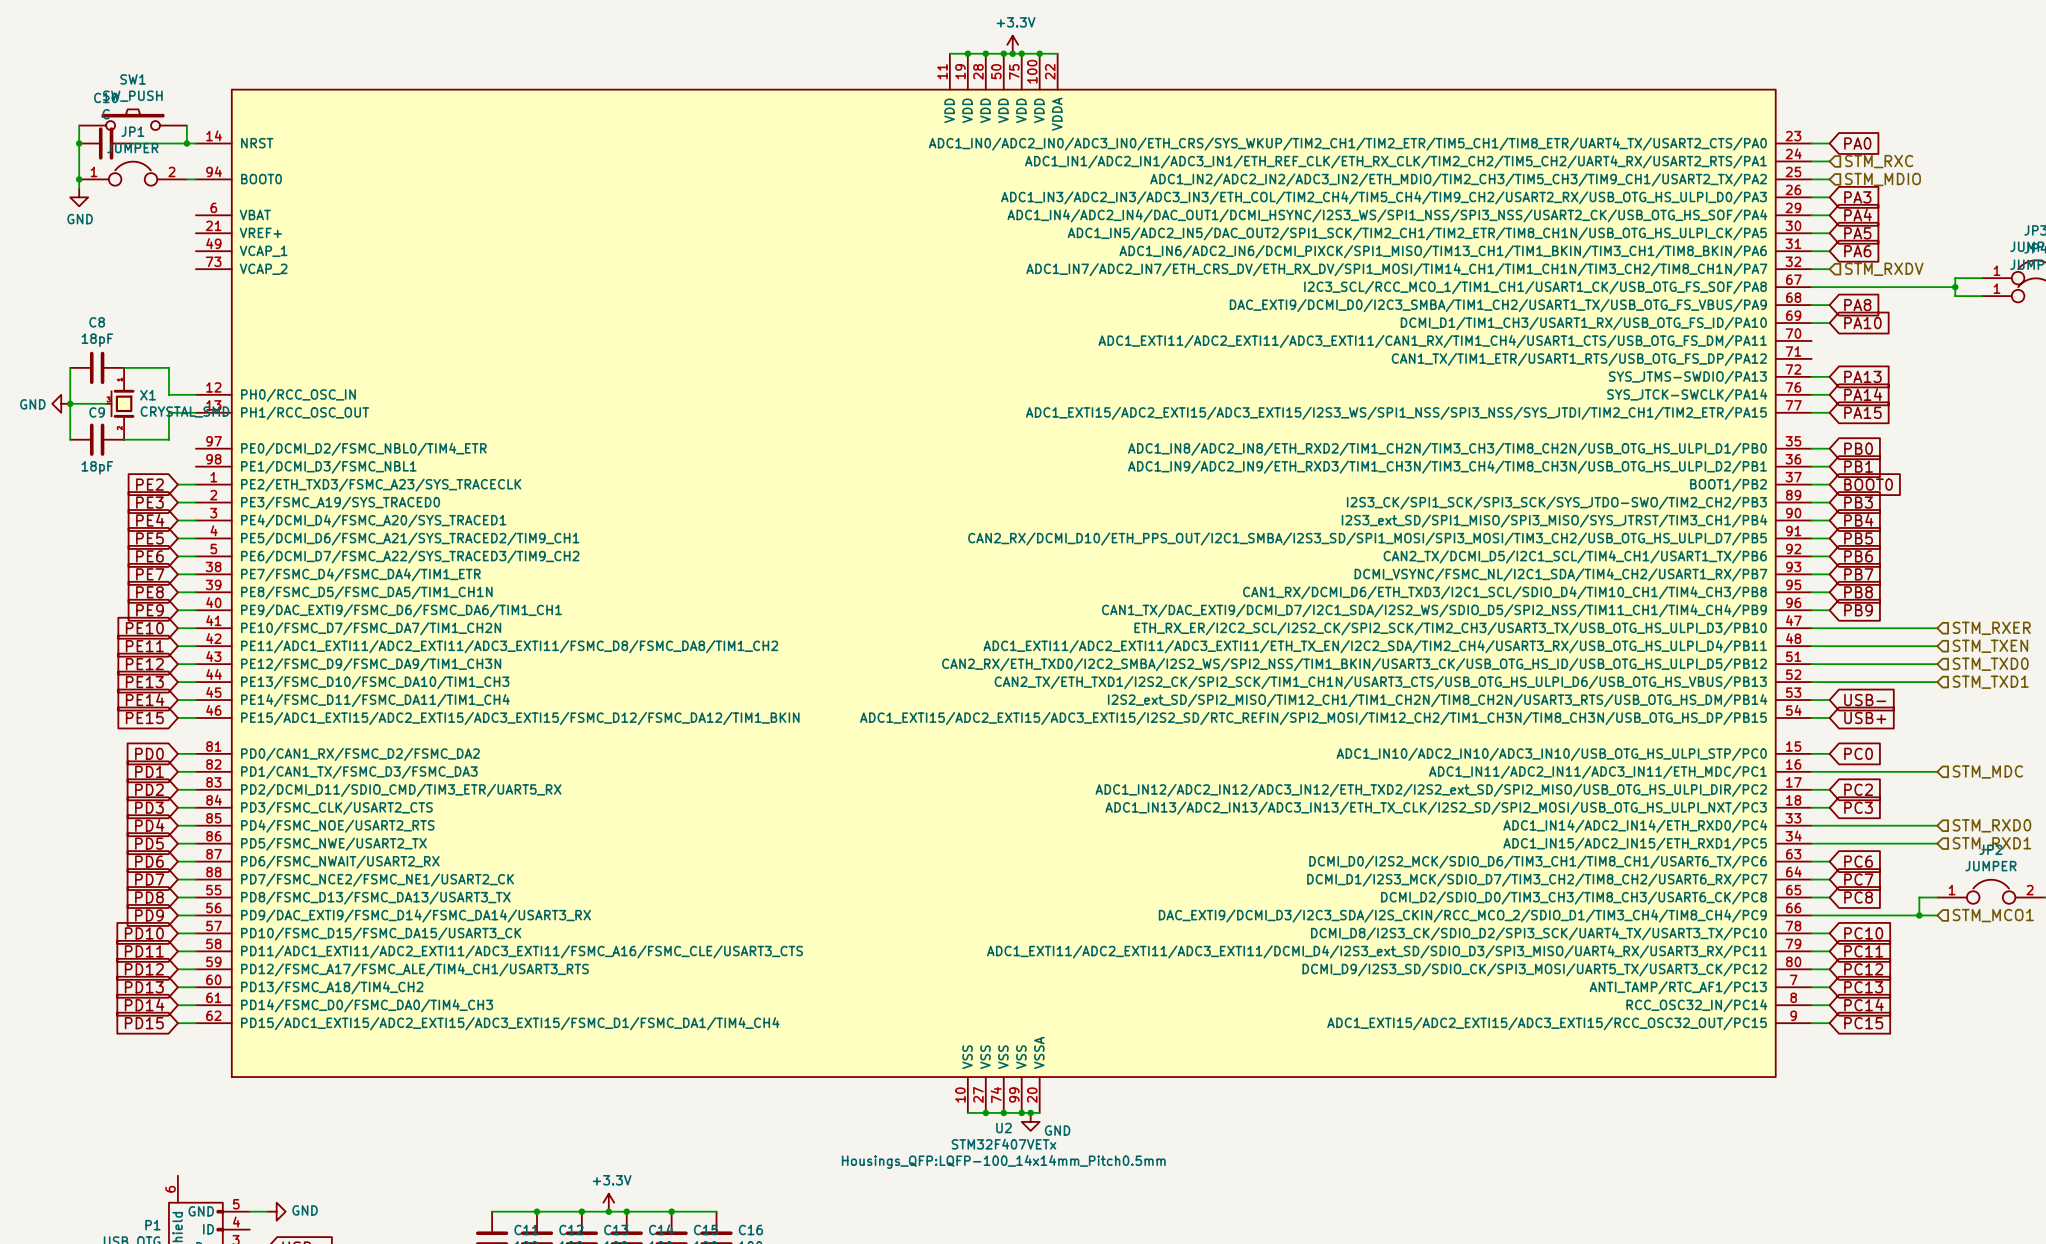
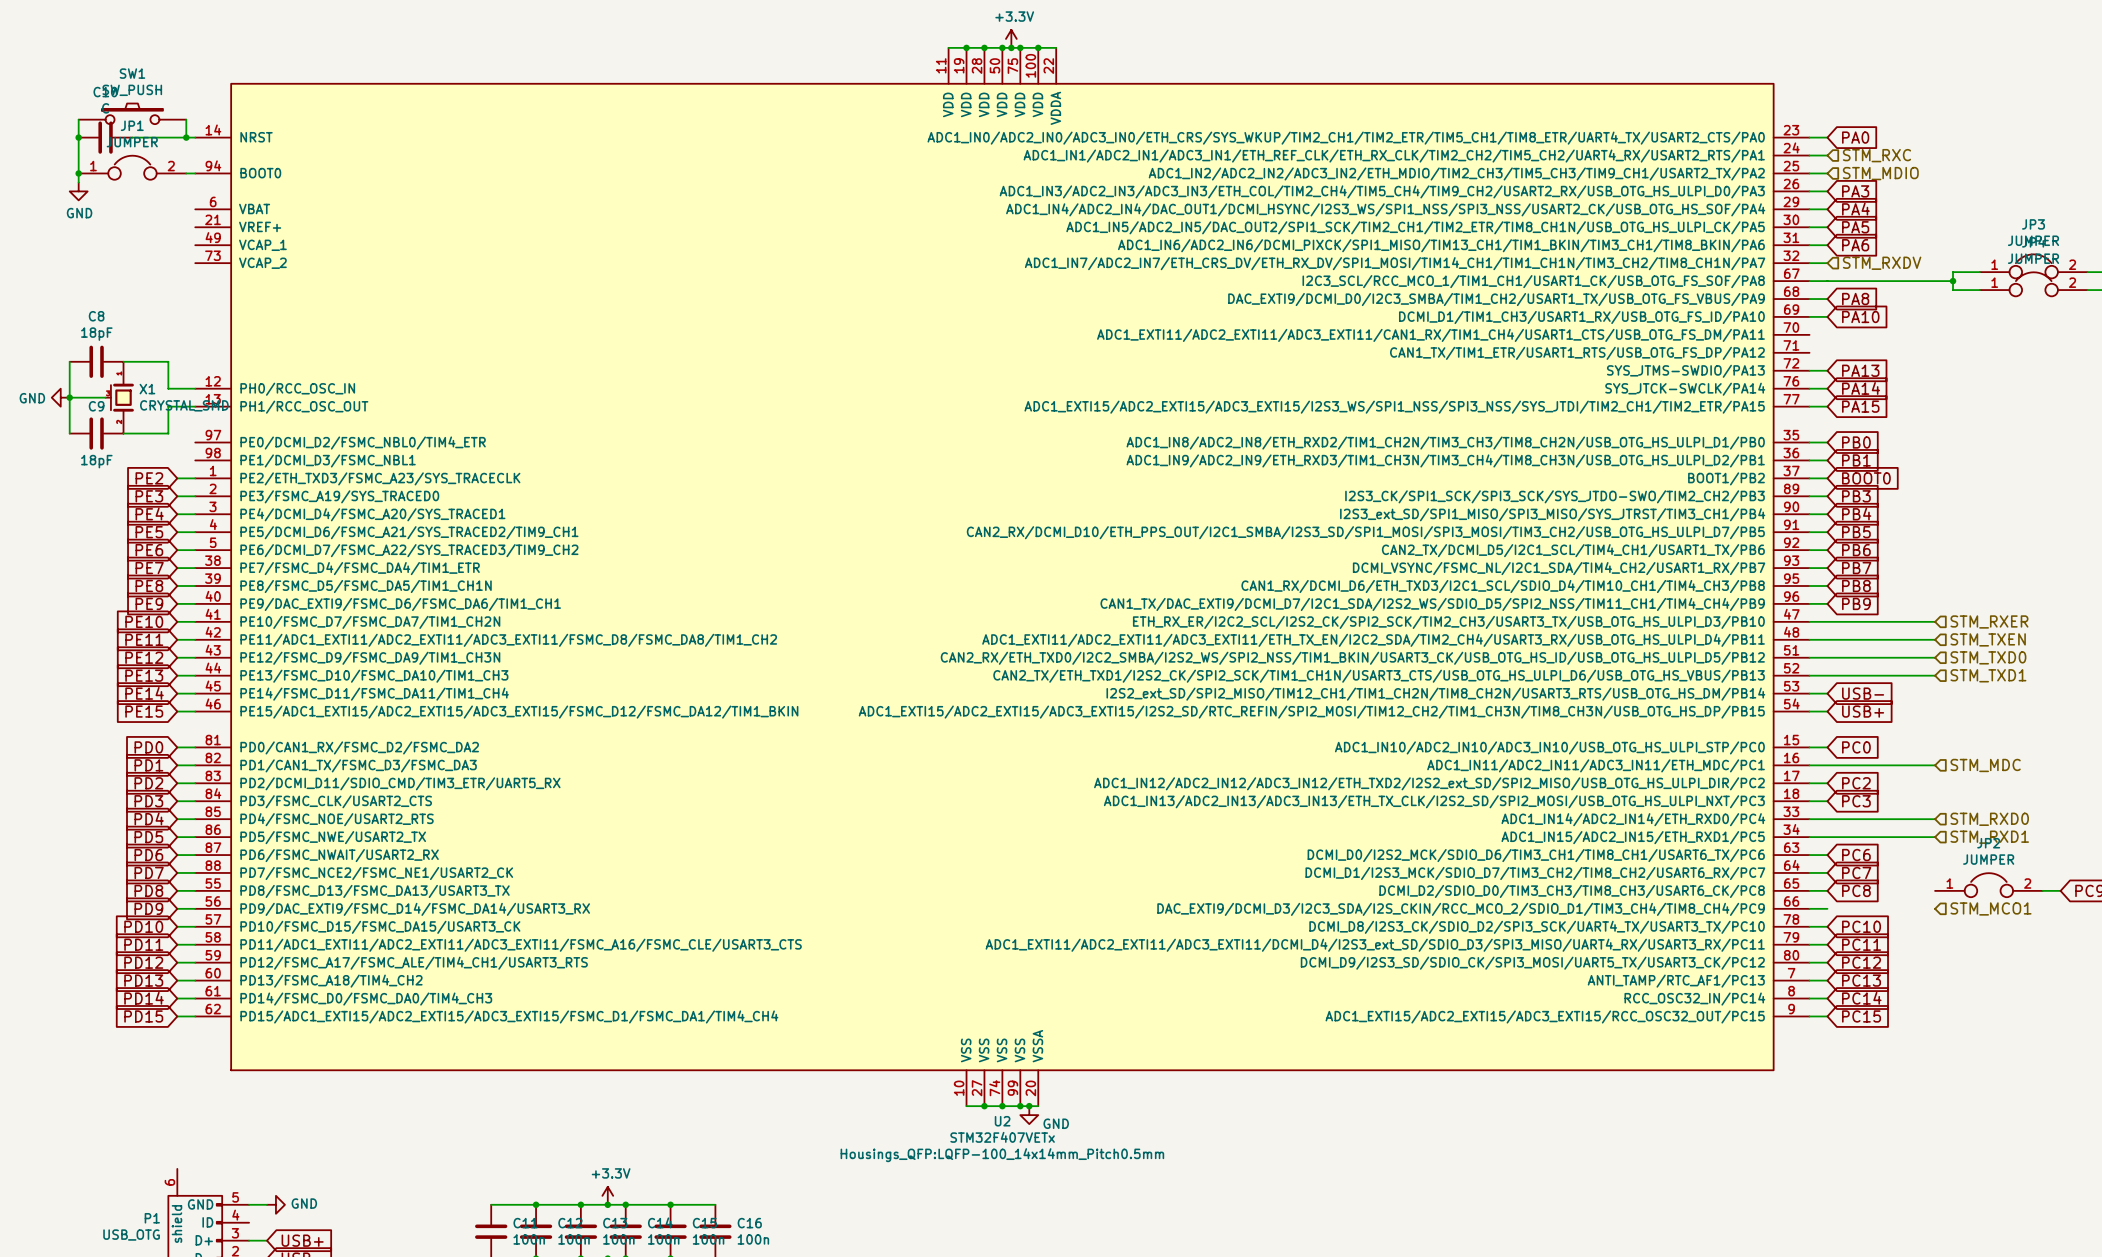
wire: (1937, 897) (1919, 897) (1919, 915) -> none
wire: (1829, 915) (1937, 915) -> none
junction: (1919, 915) -> none

